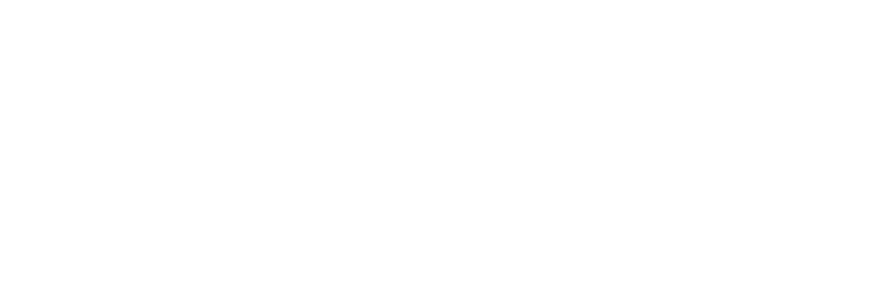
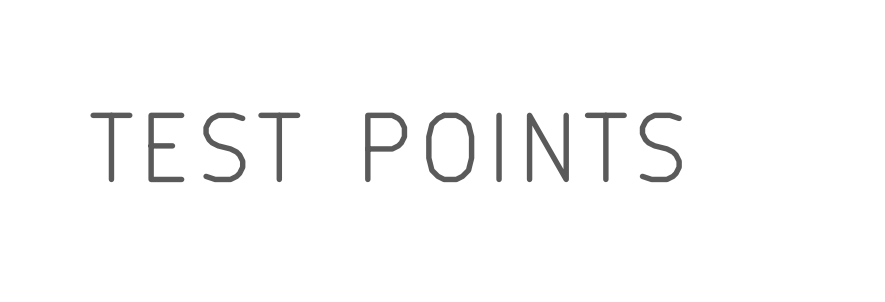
text: none -> TEST POINTS (386, 147)

